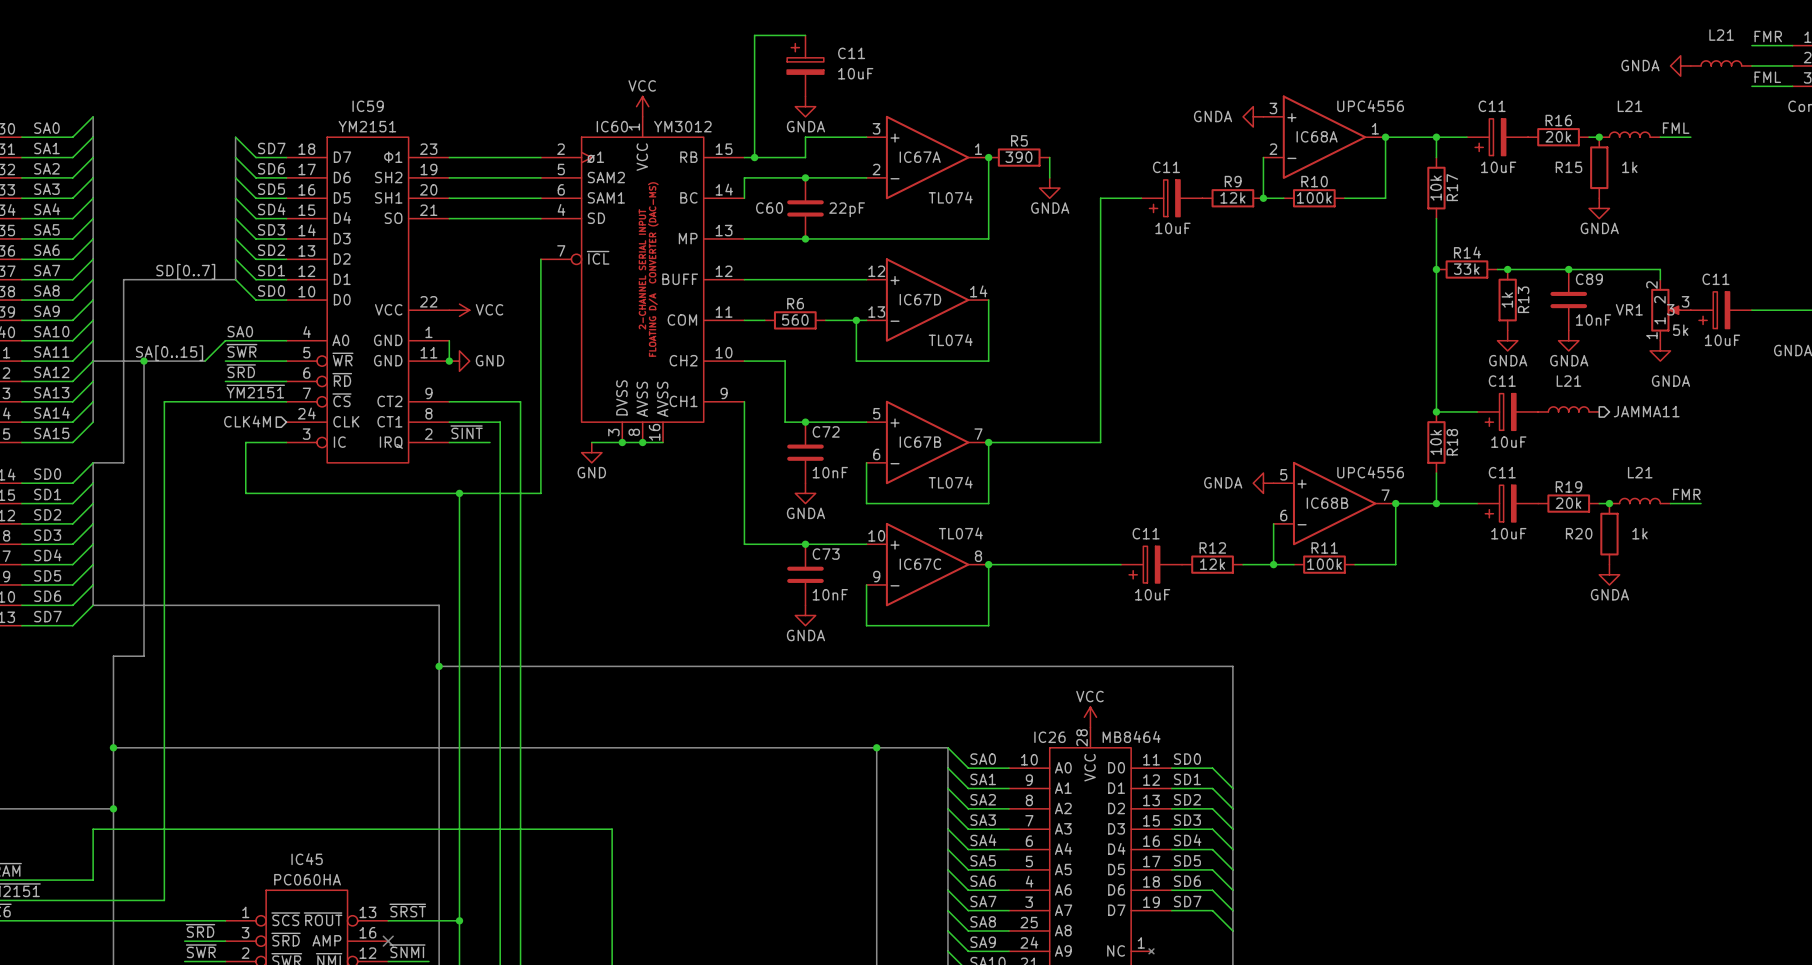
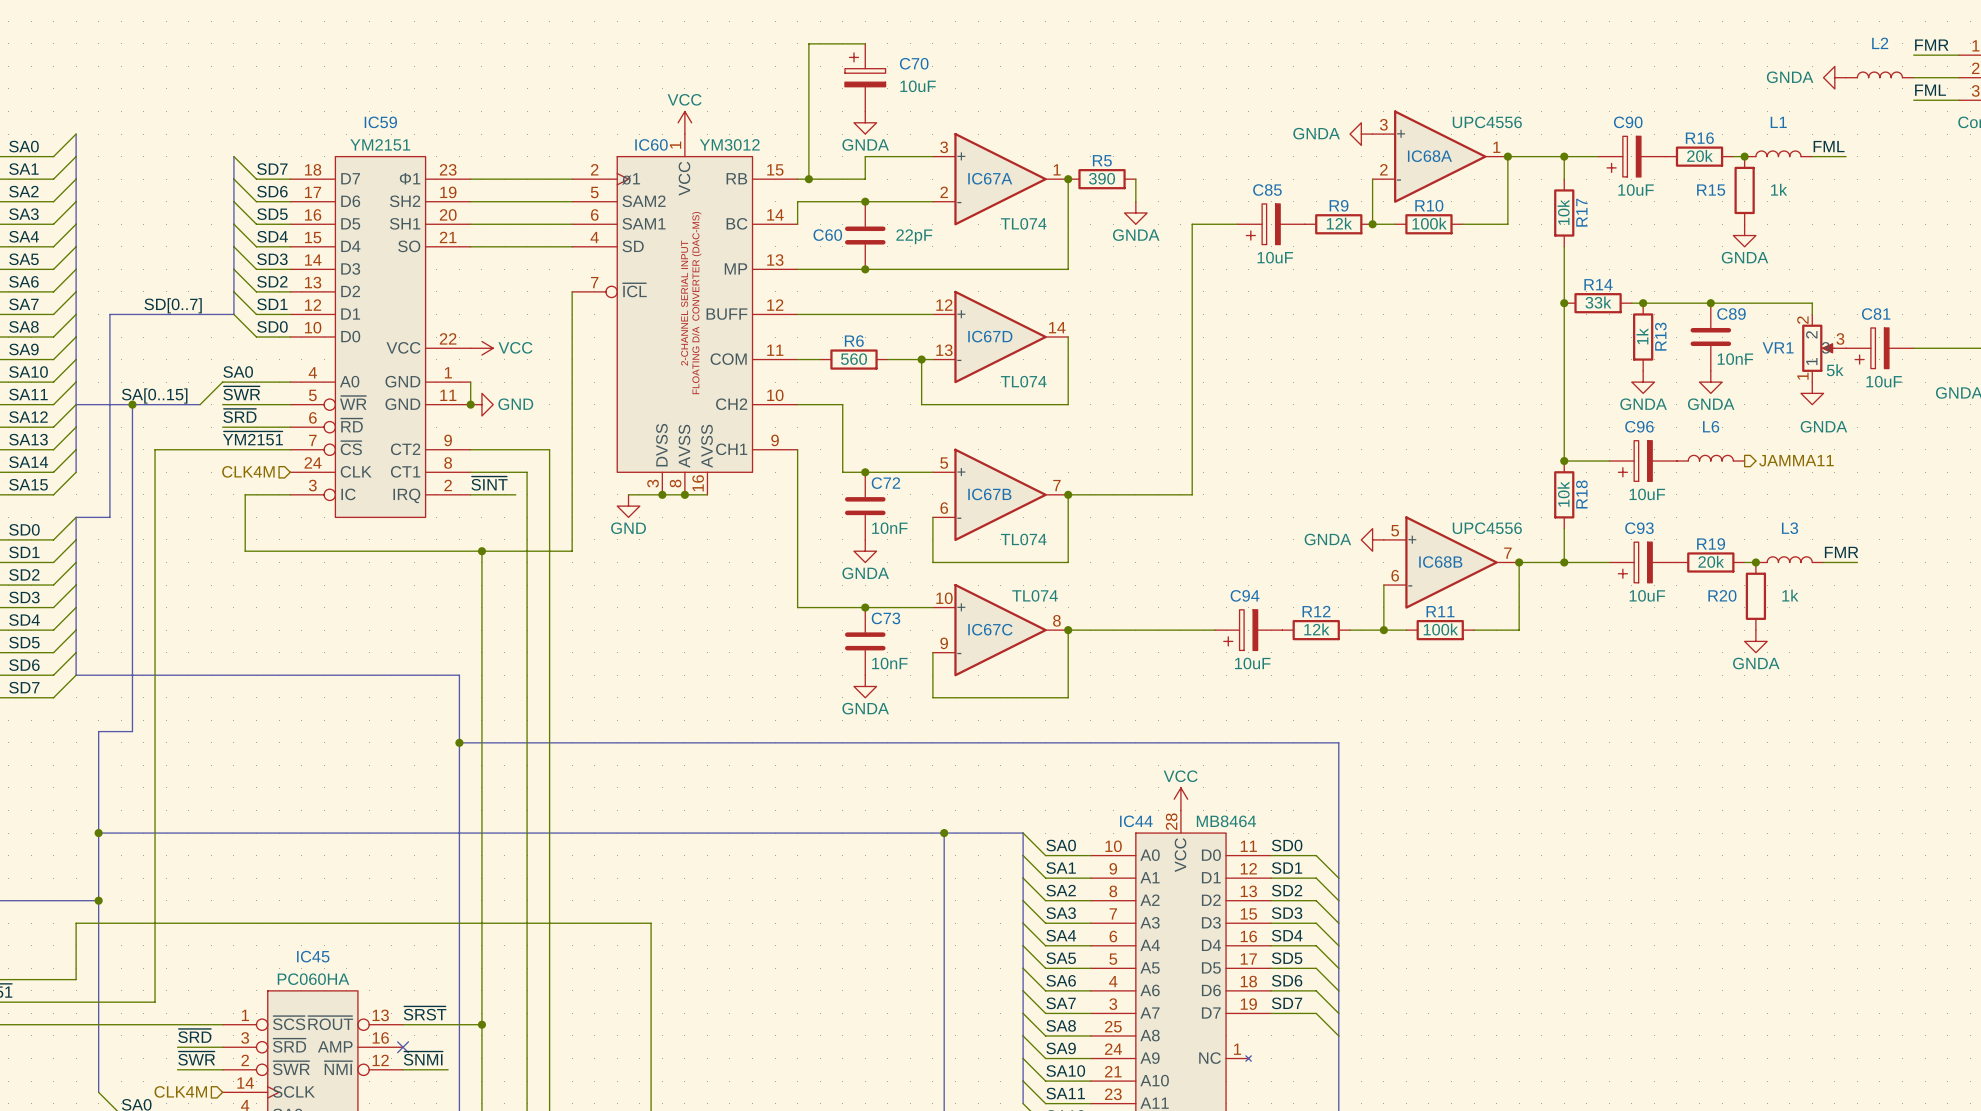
L21 name: L21 (1721, 35) -> L2 (1880, 43)
C11 name: C11 (851, 53) -> C70 (914, 63)
C11 name: C11 (1492, 106) -> C90 (1628, 122)
L21 name: L21 (1630, 106) -> L1 (1778, 122)
C11 name: C11 (1166, 167) -> C85 (1267, 190)
C11 name: C11 (1715, 279) -> C81 (1876, 314)
C11 name: C11 (1502, 381) -> C96 (1639, 426)
L21 name: L21 (1568, 381) -> L6 (1711, 426)
C11 name: C11 (1502, 472) -> C93 (1639, 528)
L21 name: L21 (1640, 472) -> L3 (1790, 528)
C11 name: C11 (1146, 533) -> C94 (1245, 595)
IC26 name: IC26 (1049, 737) -> IC44 (1136, 821)

